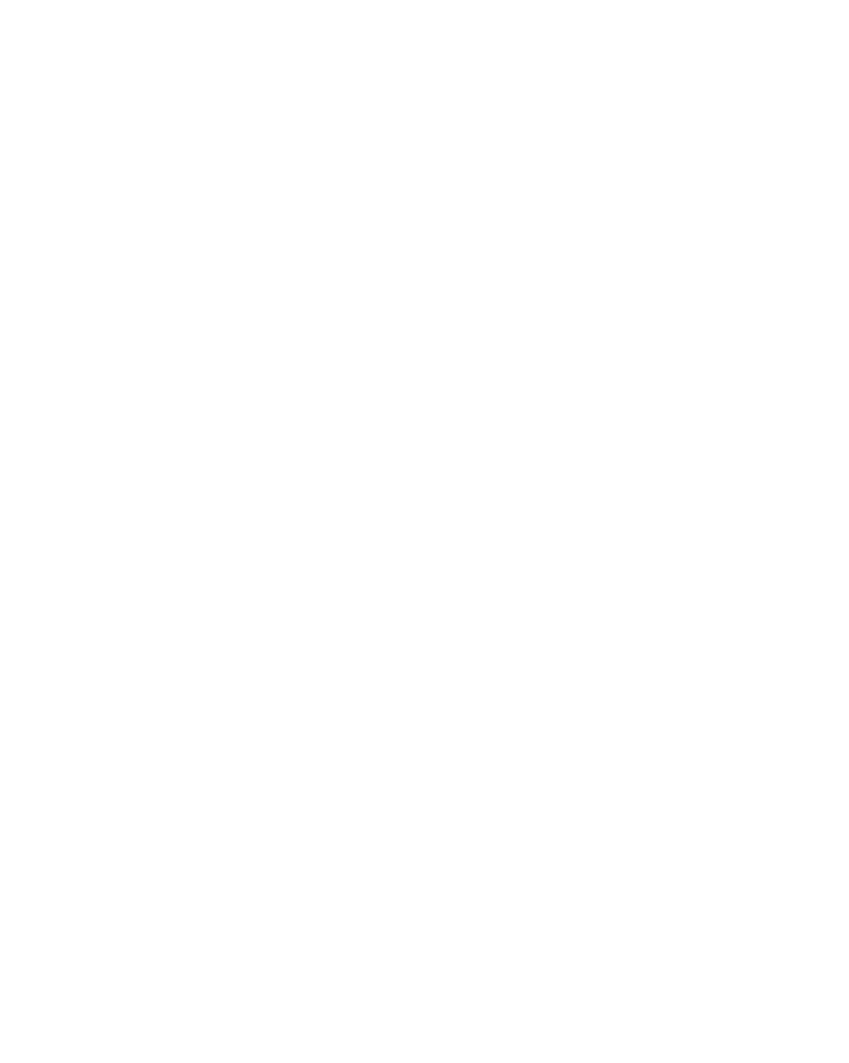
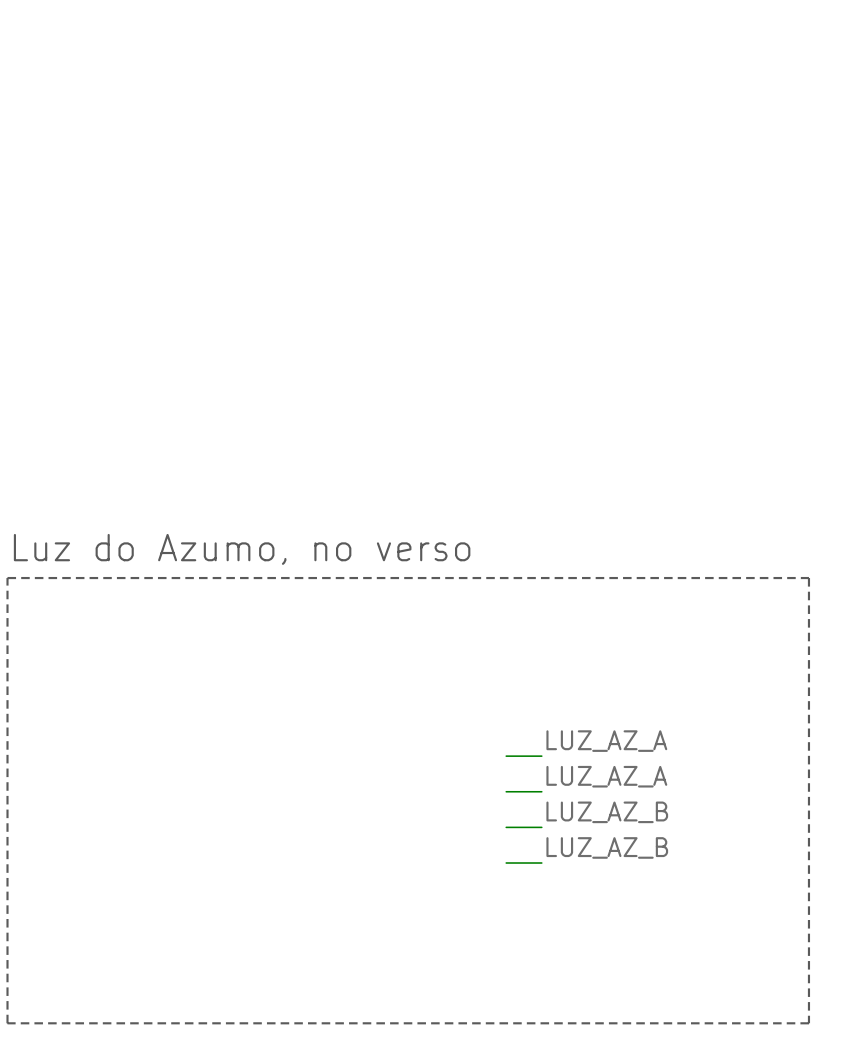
text: none -> Luz do Azumo, no verso (242, 549)
line: none -> (7, 578) (808, 578) (808, 1023) (7, 1023) (7, 578)
label: none -> LUZ_AZ_A (606, 741)
wire: none -> (506, 756) (541, 756)
label: none -> LUZ_AZ_A (606, 776)
wire: none -> (506, 791) (541, 791)
label: none -> LUZ_AZ_B (607, 812)
wire: none -> (506, 827) (541, 827)
label: none -> LUZ_AZ_B (607, 847)
wire: none -> (506, 863) (541, 863)

